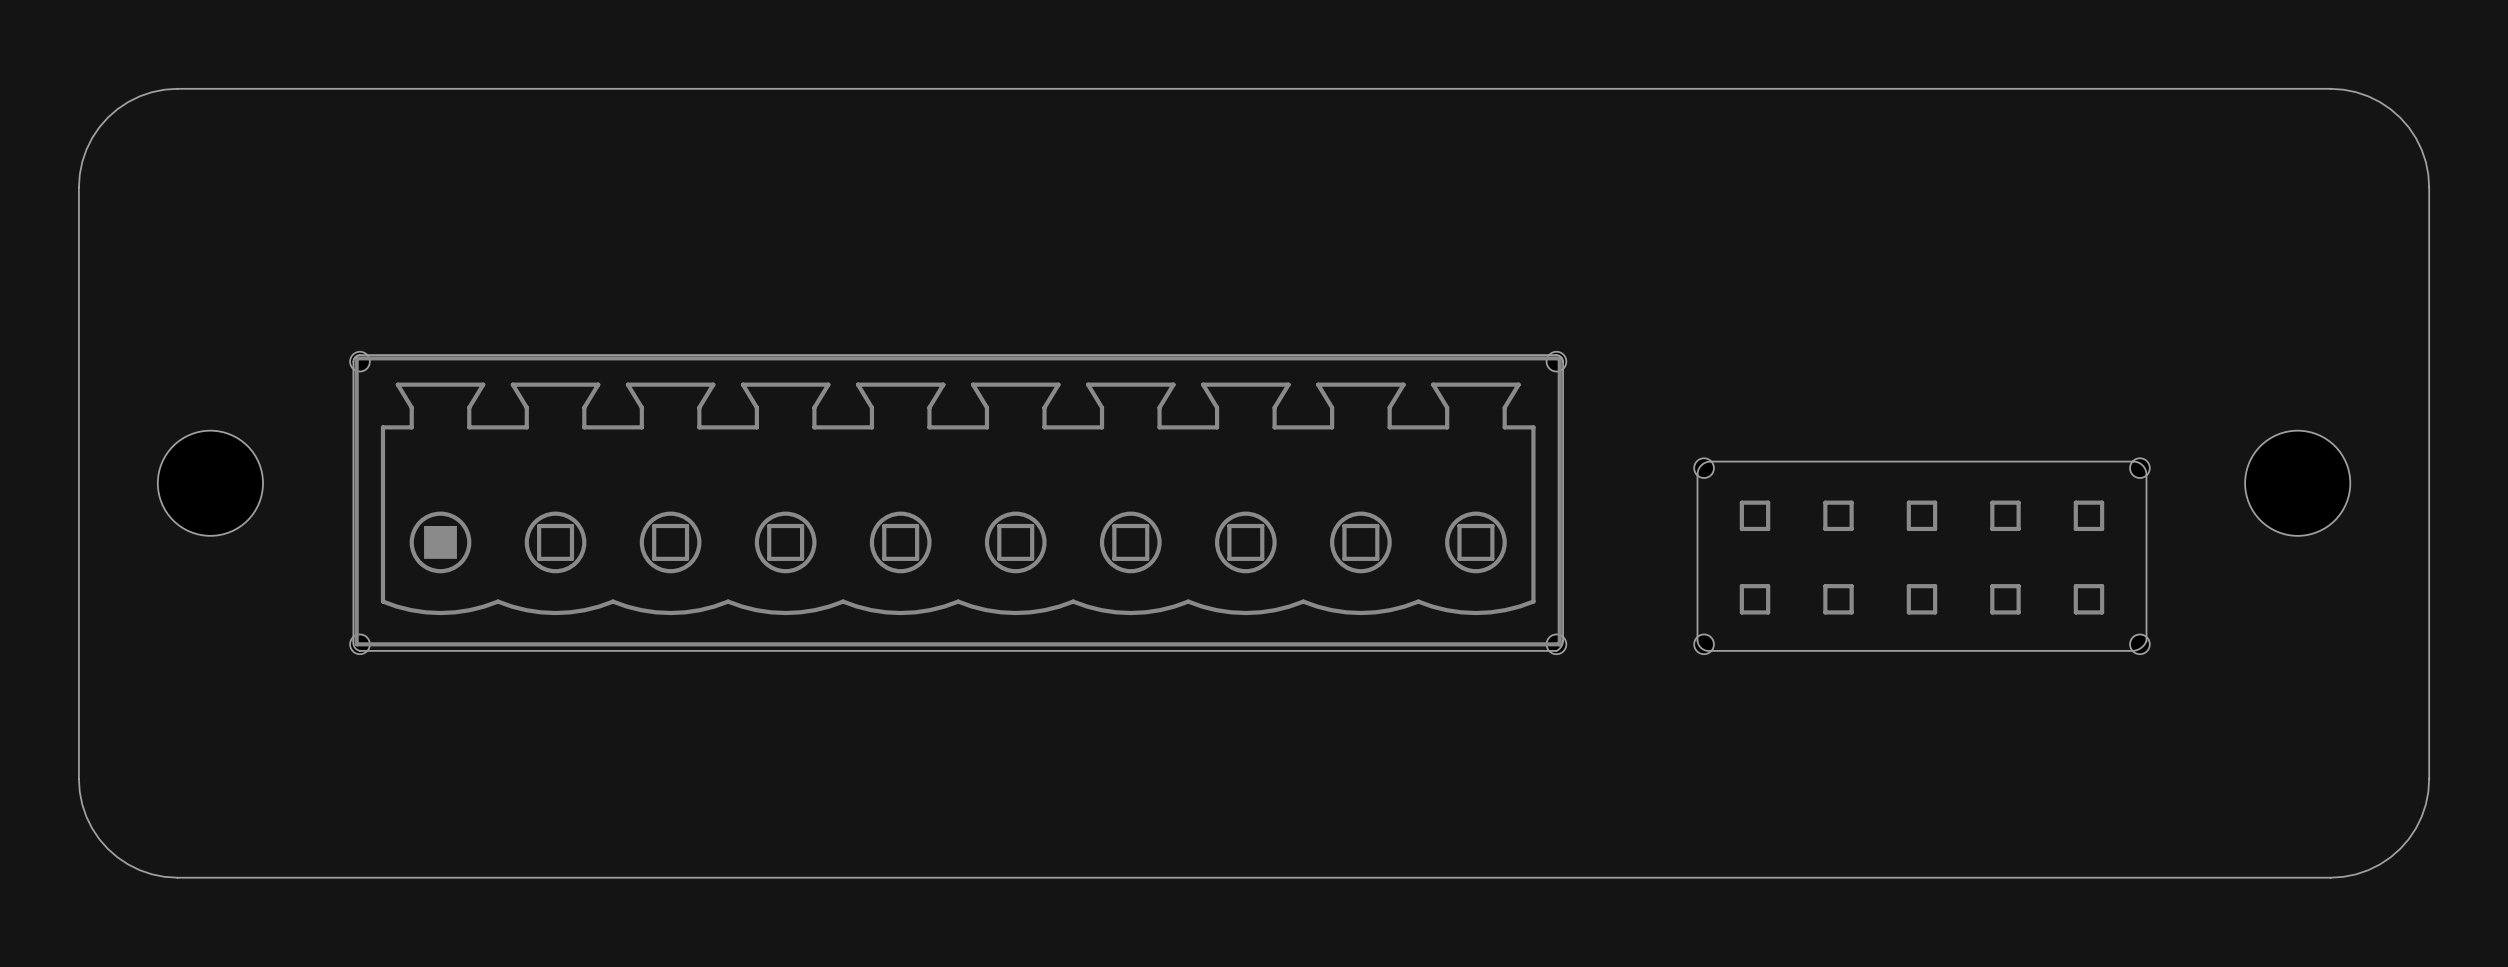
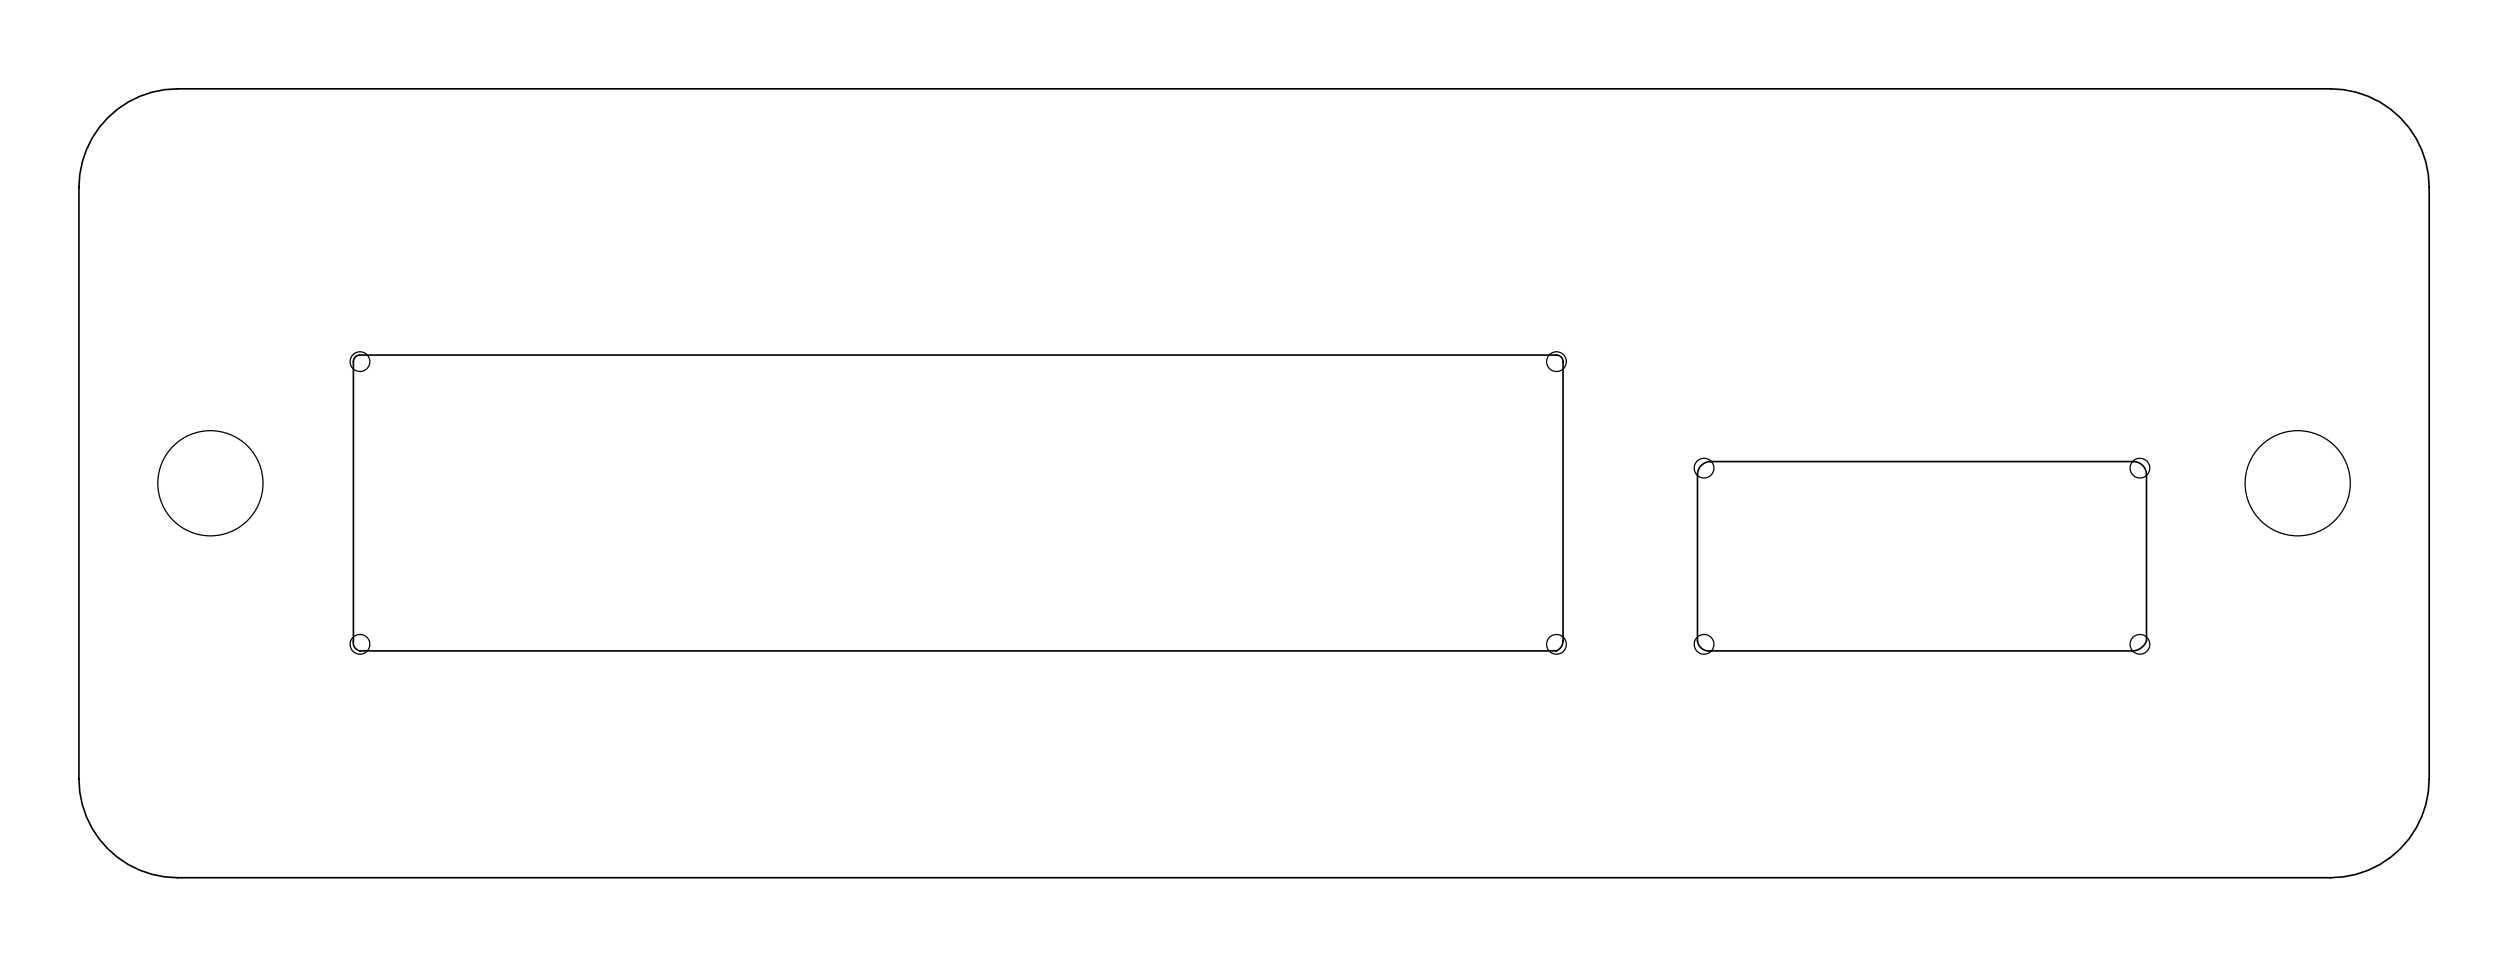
part footprint: [350, 351, 1567, 655] -> [350, 351, 1567, 655]
part footprint: [1694, 458, 2150, 655] -> [1694, 458, 2150, 655]

